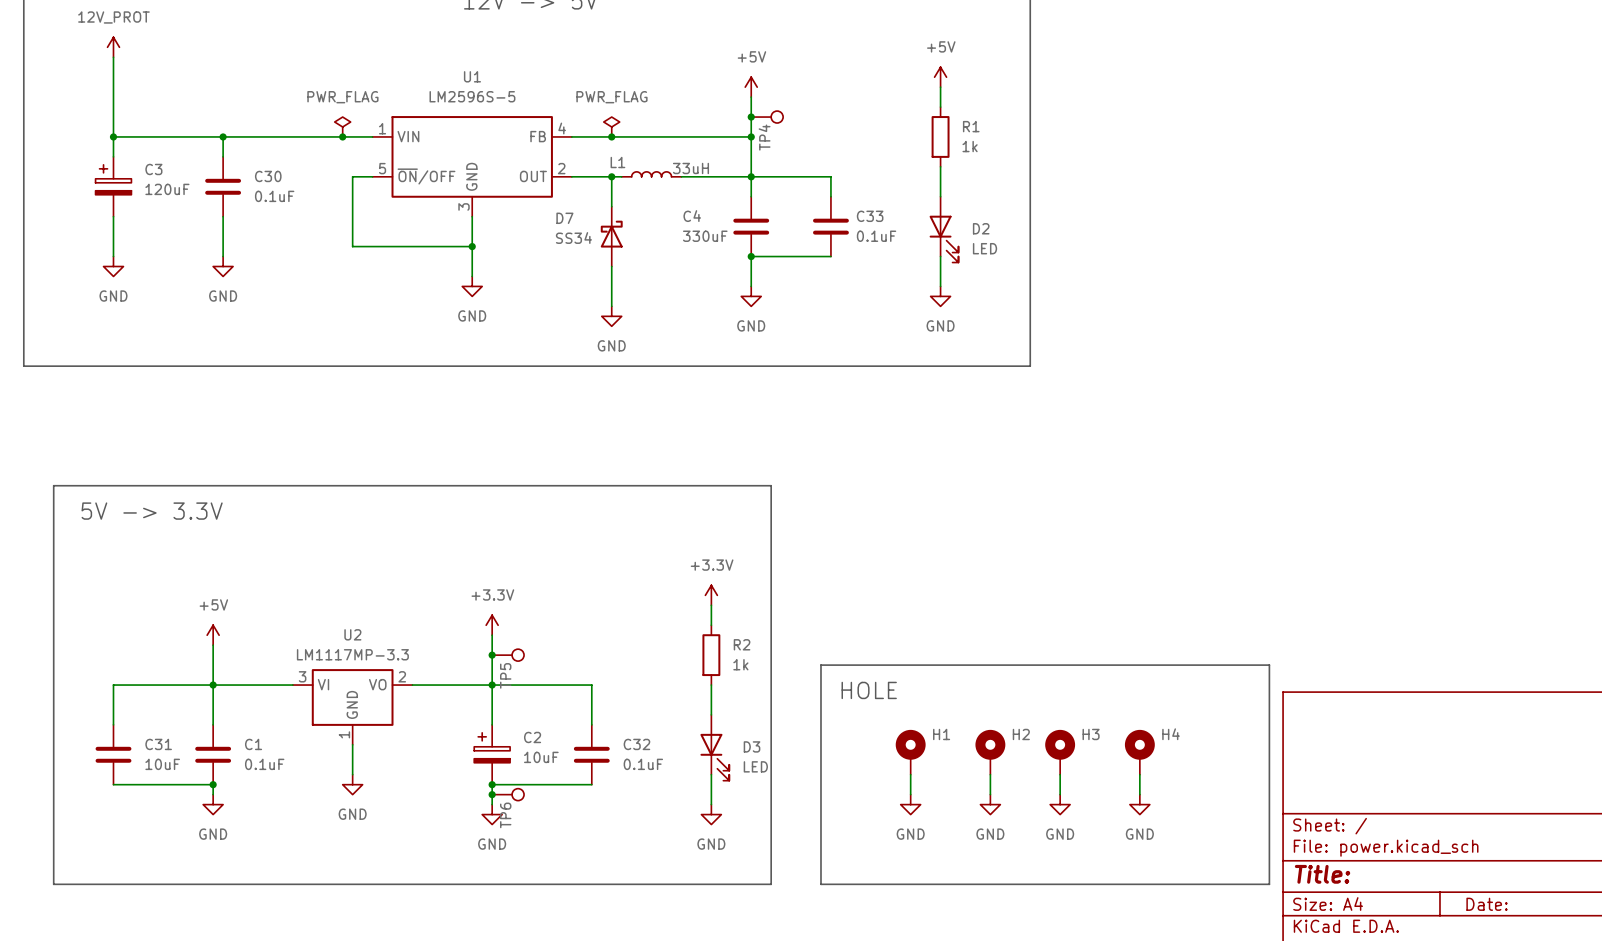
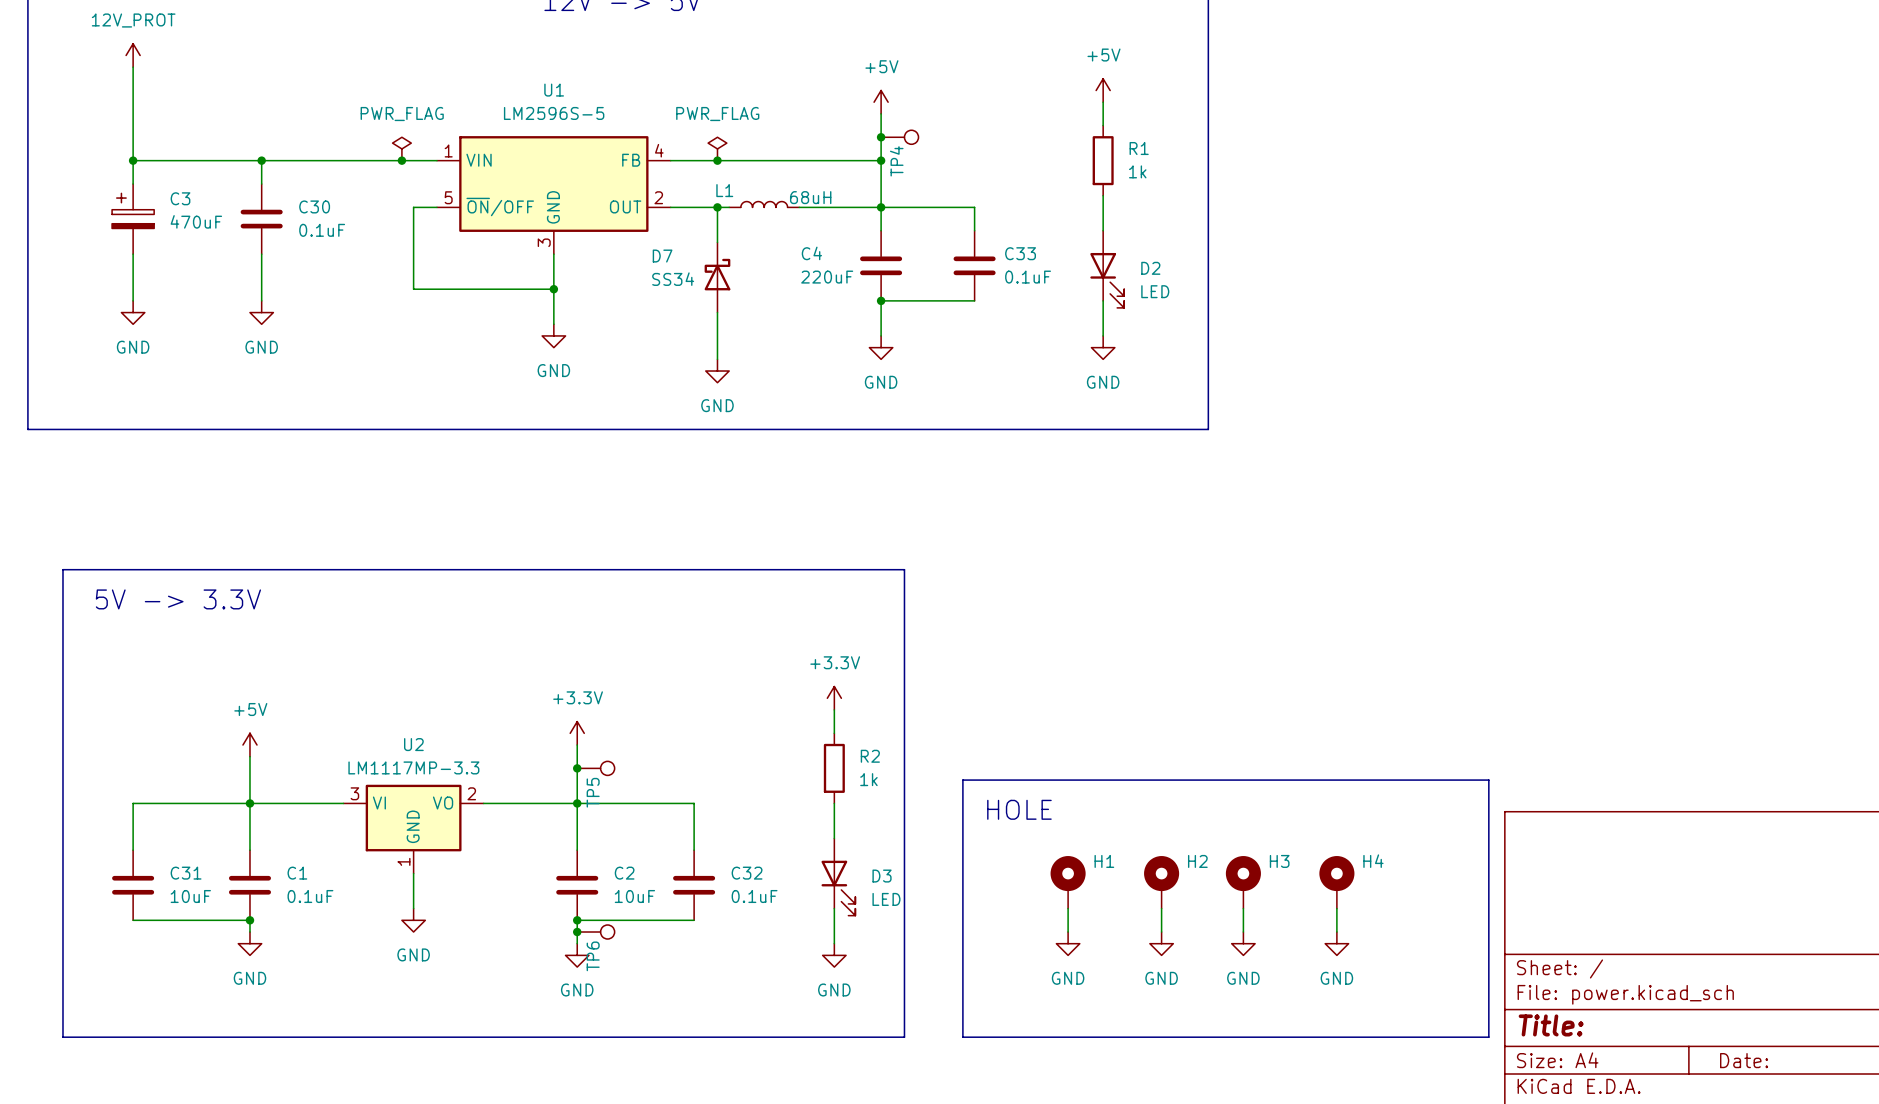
L1 value: 33uH (690, 168) -> 68uH (810, 197)
C3 value: 120uF (167, 189) -> 470uF (196, 221)
C4 value: 330uF (705, 236) -> 220uF (827, 277)
C2 symbol: [474, 724, 511, 785] -> [556, 850, 599, 921]

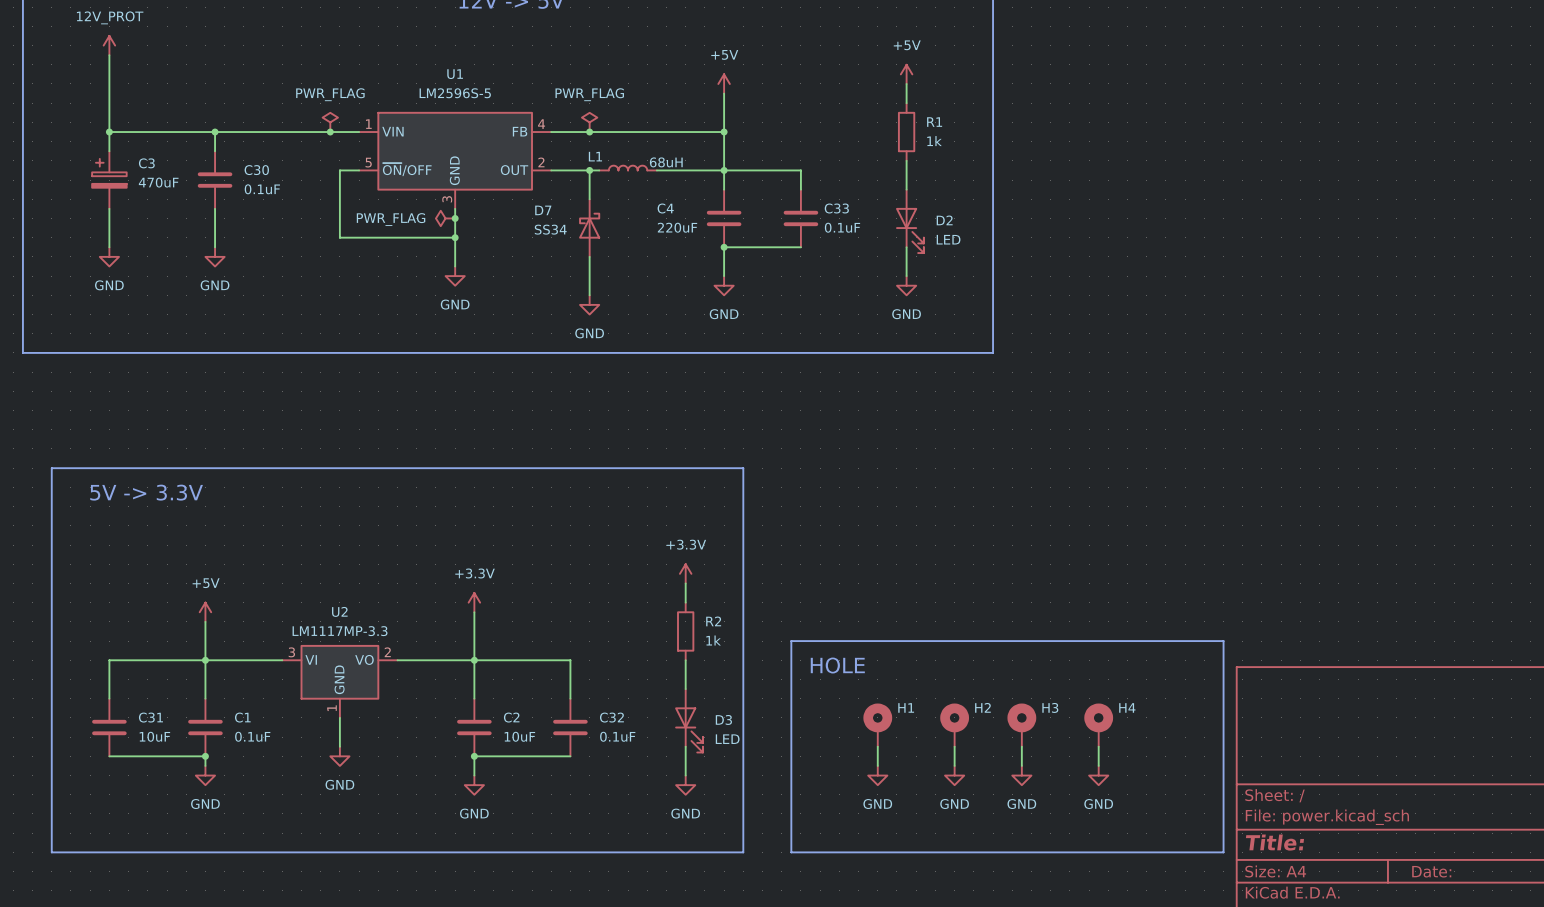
junction: (881, 137) -> none
TP4: (899, 137) -> none
power symbol: none -> PWR_FLAG (445, 218)
junction: none -> (455, 218)
junction: (577, 768) -> none
TP5: (595, 768) -> none
junction: (577, 932) -> none
TP6: (595, 932) -> none

